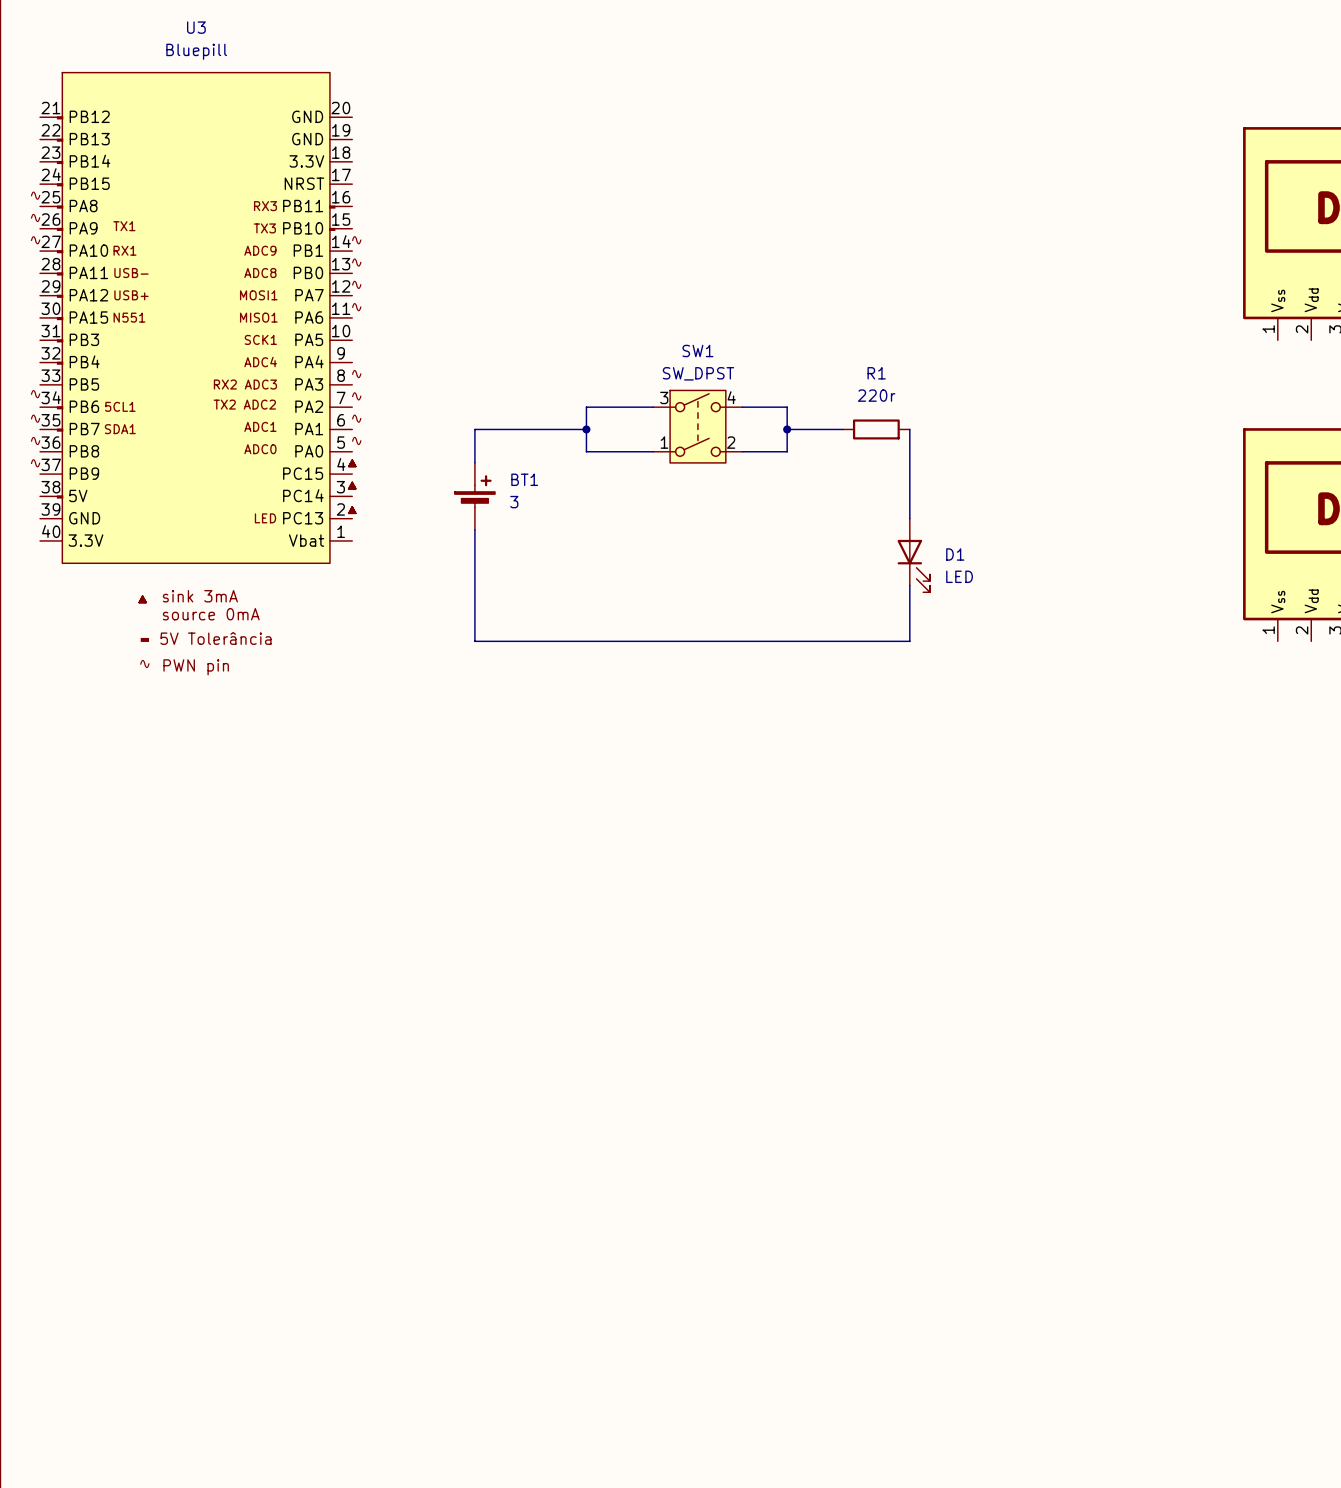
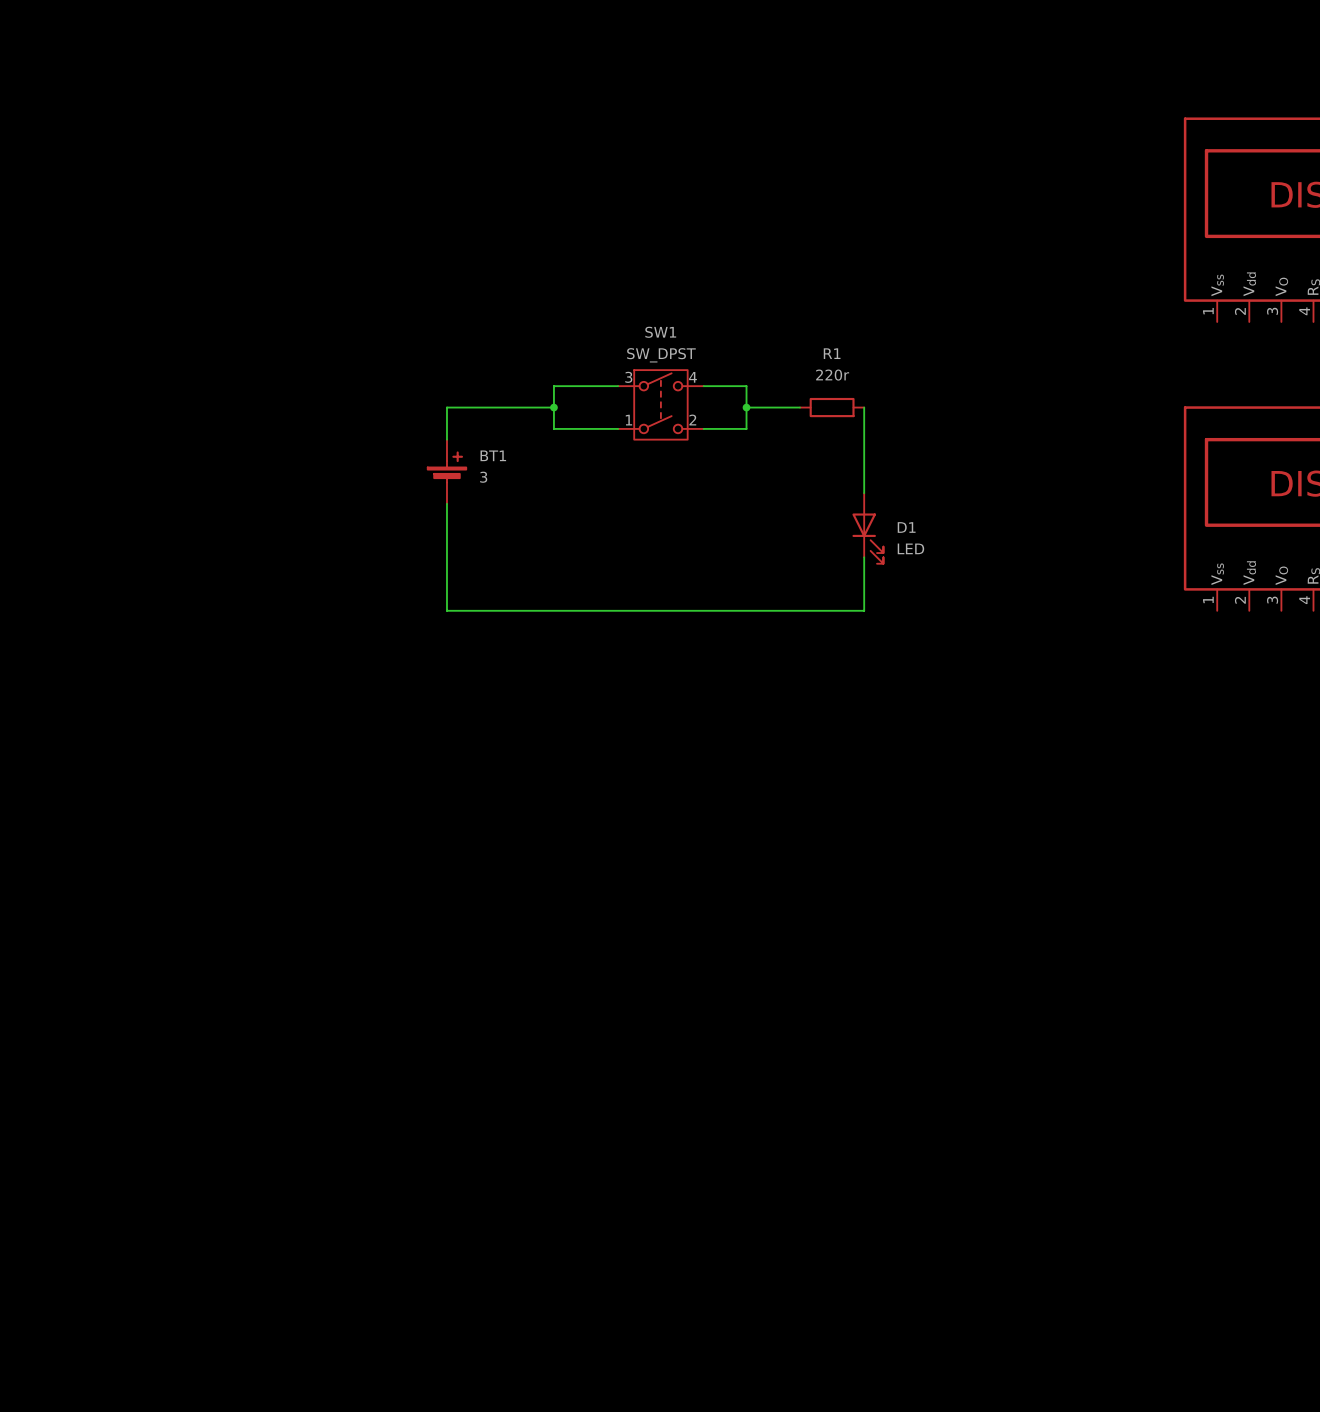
U3: Bluepill (196, 317) -> none

